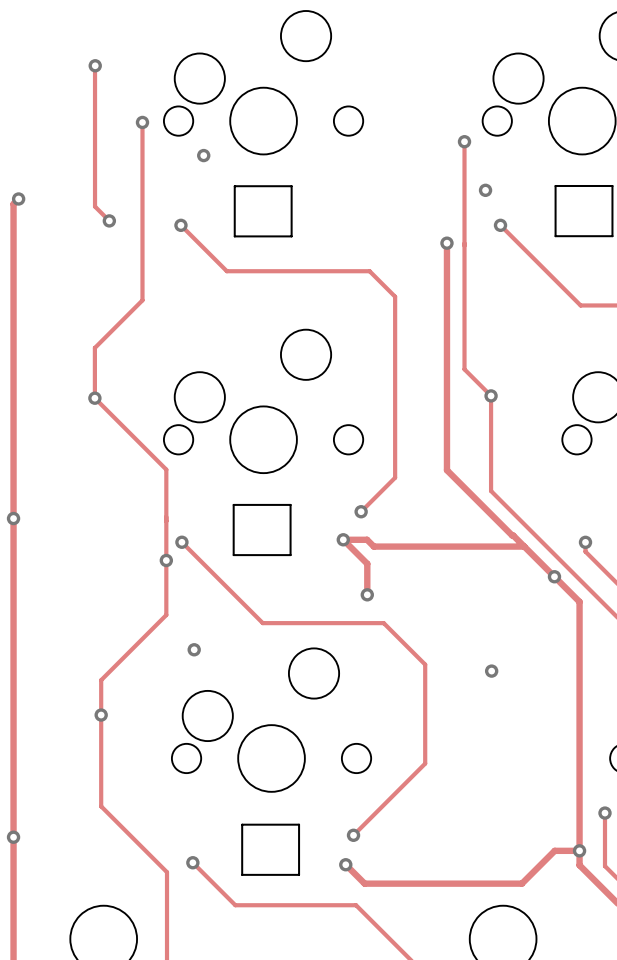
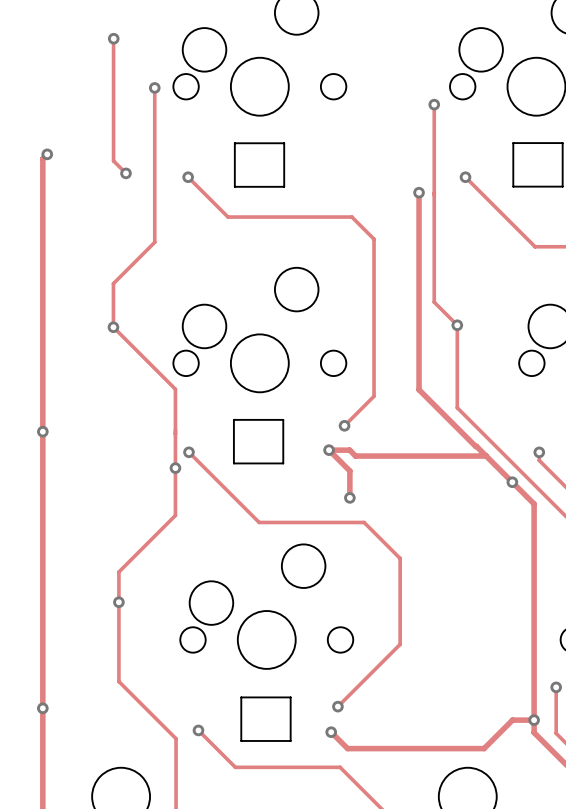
via: (203, 155) -> none
via: (485, 190) -> none
via: (194, 649) -> none
via: (491, 671) -> none

